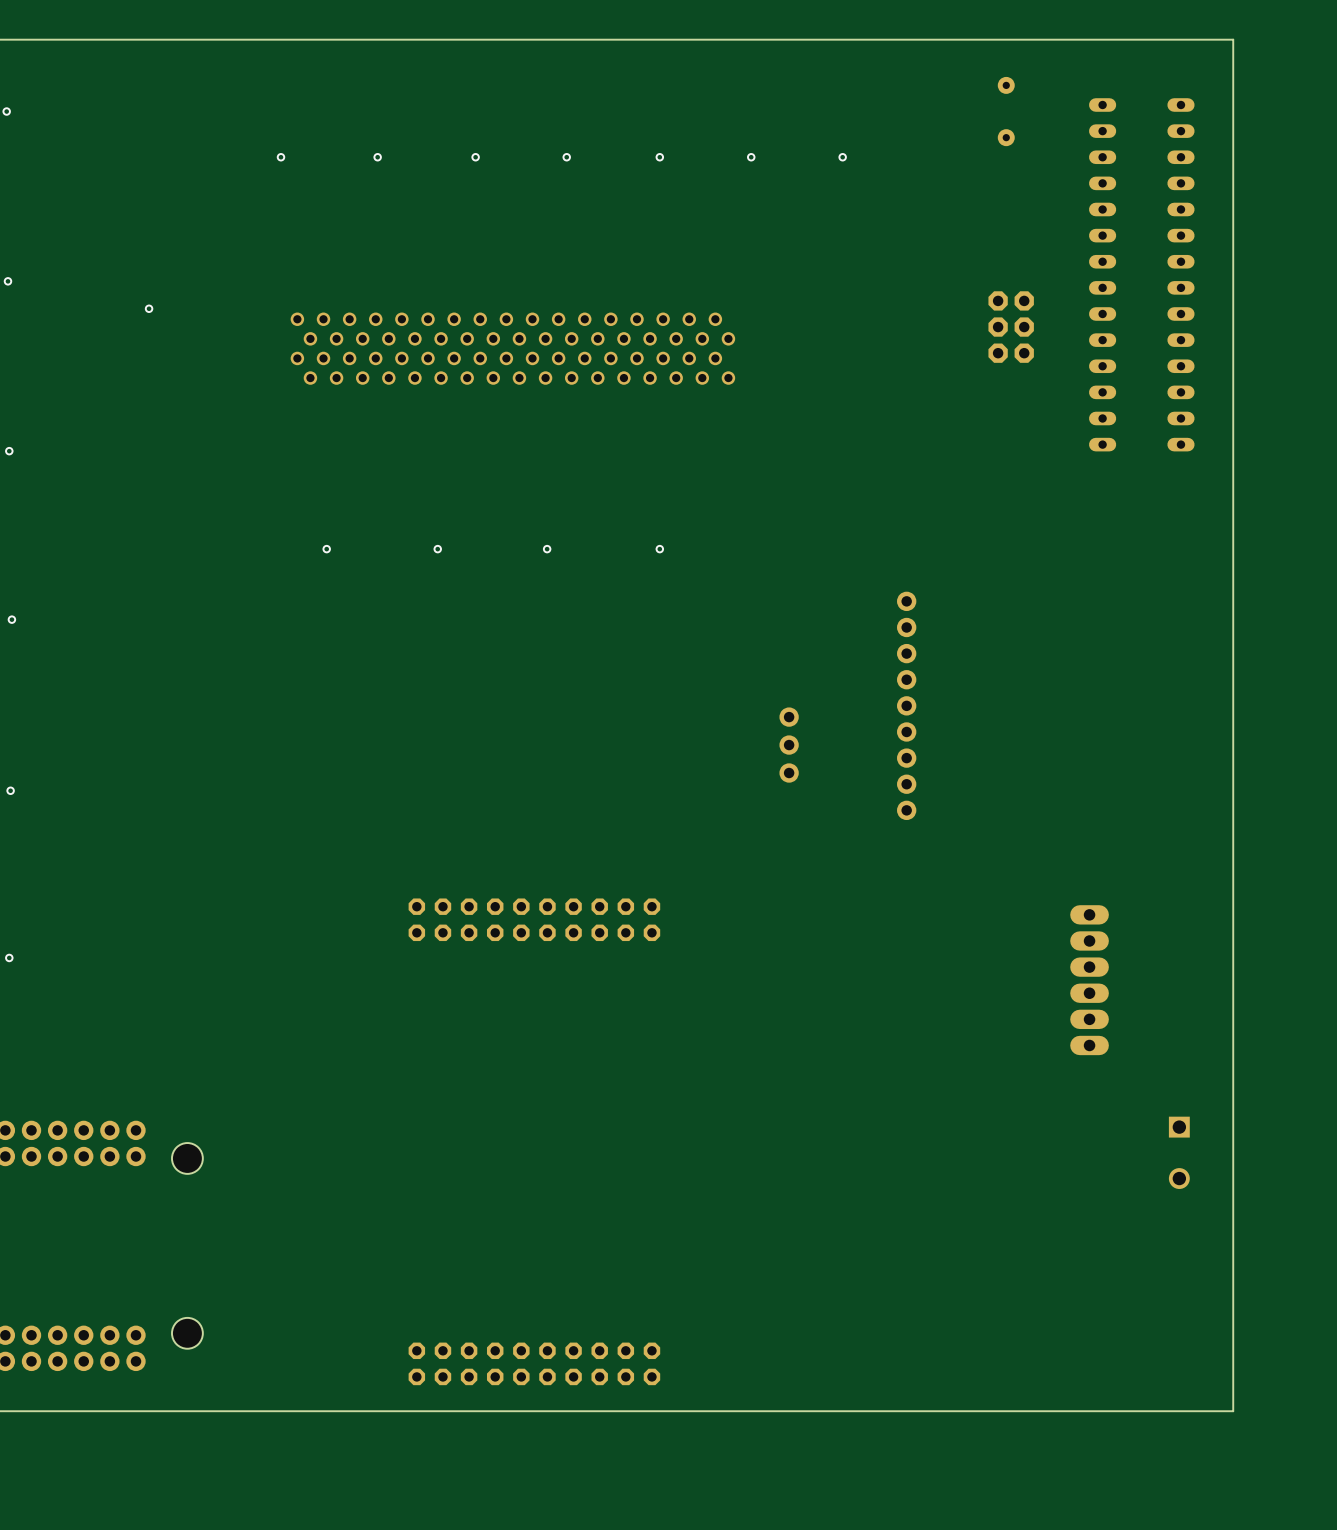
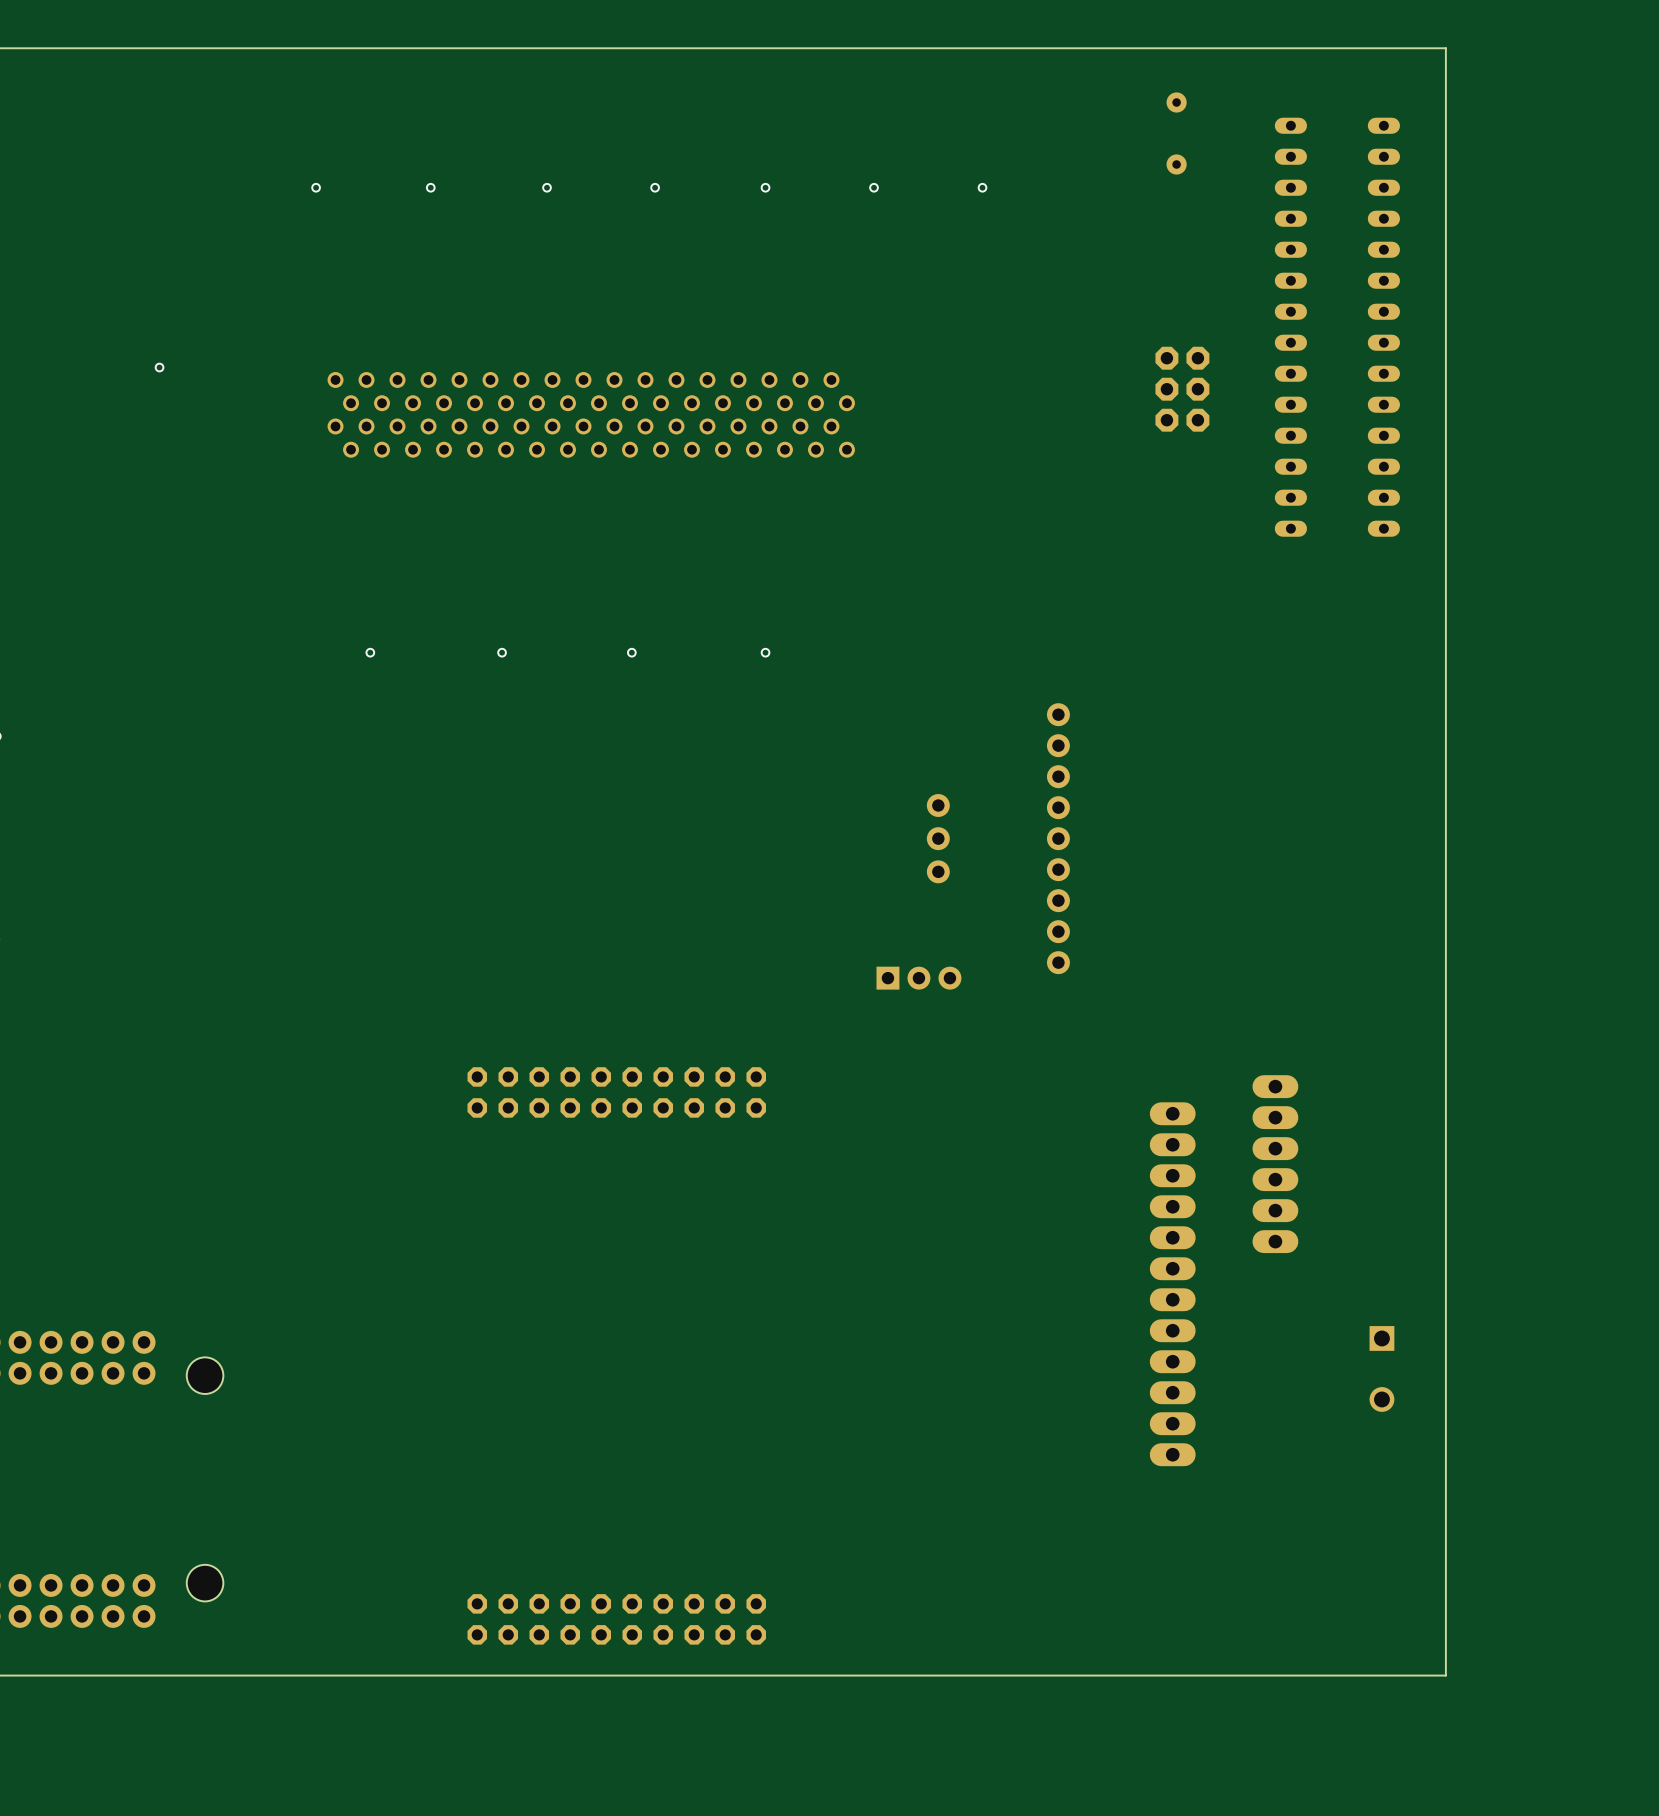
part position: (789, 745) -> (938, 838)
part: none -> (918, 978)
part: none -> (1172, 1284)

